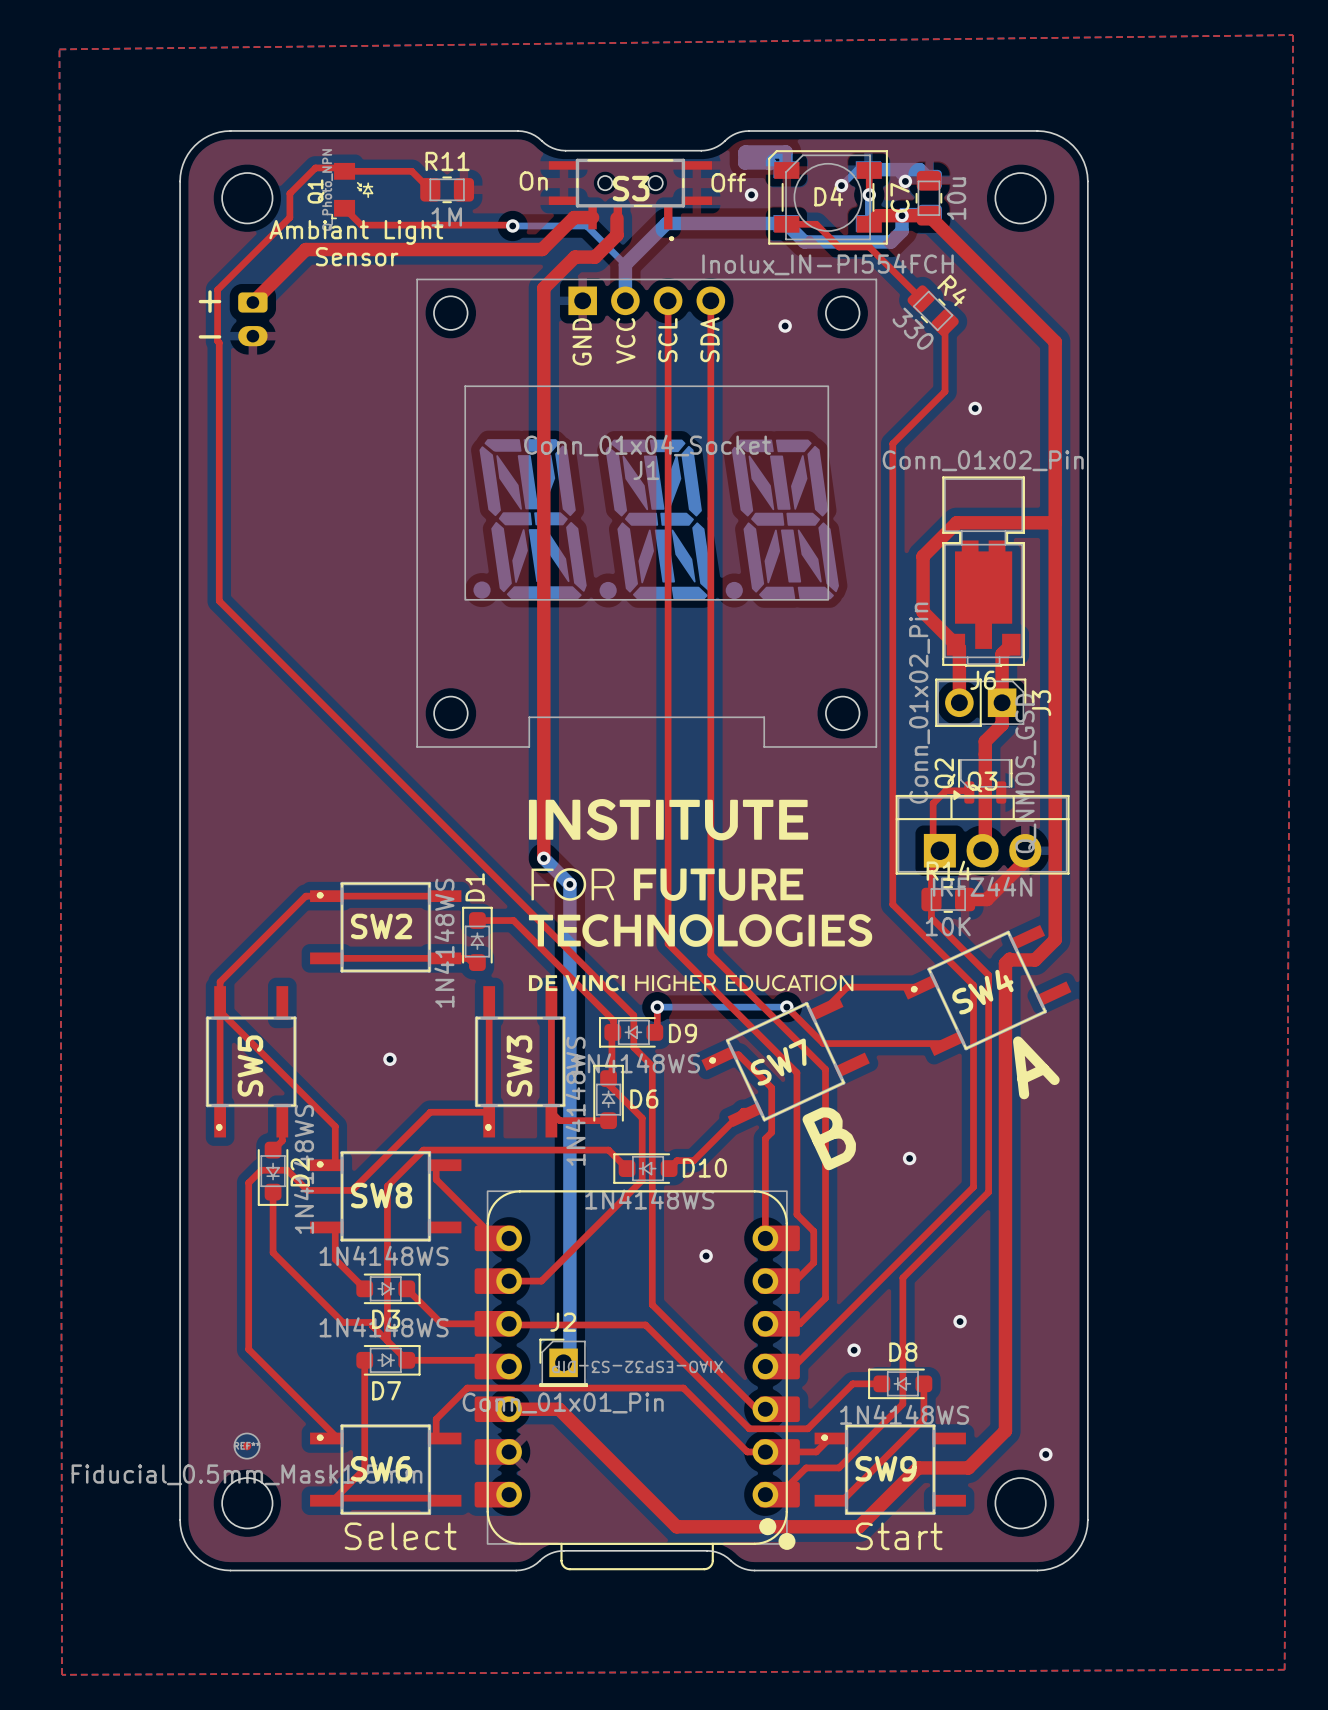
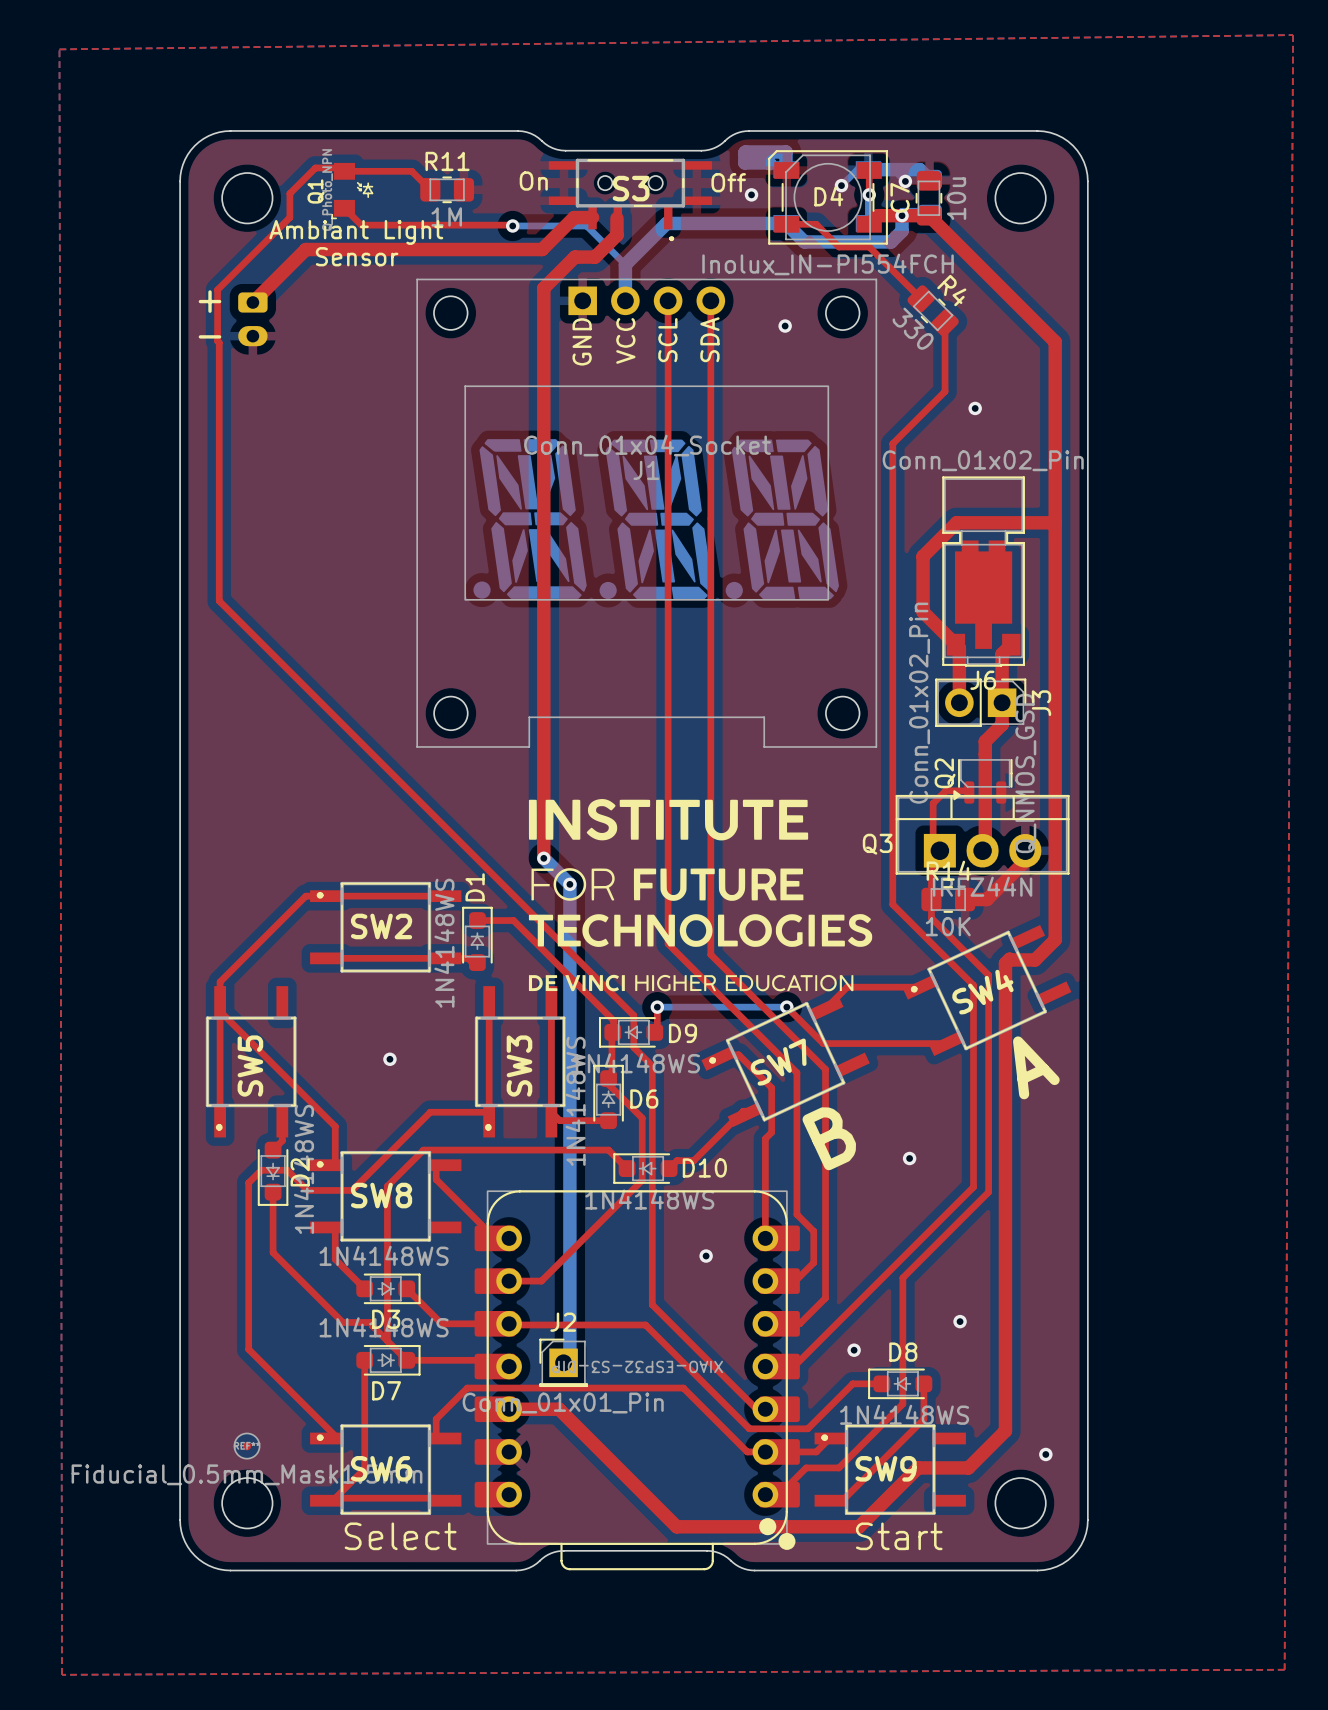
Q3 name position: Q3 (982, 781) -> Q3 (877, 844)

